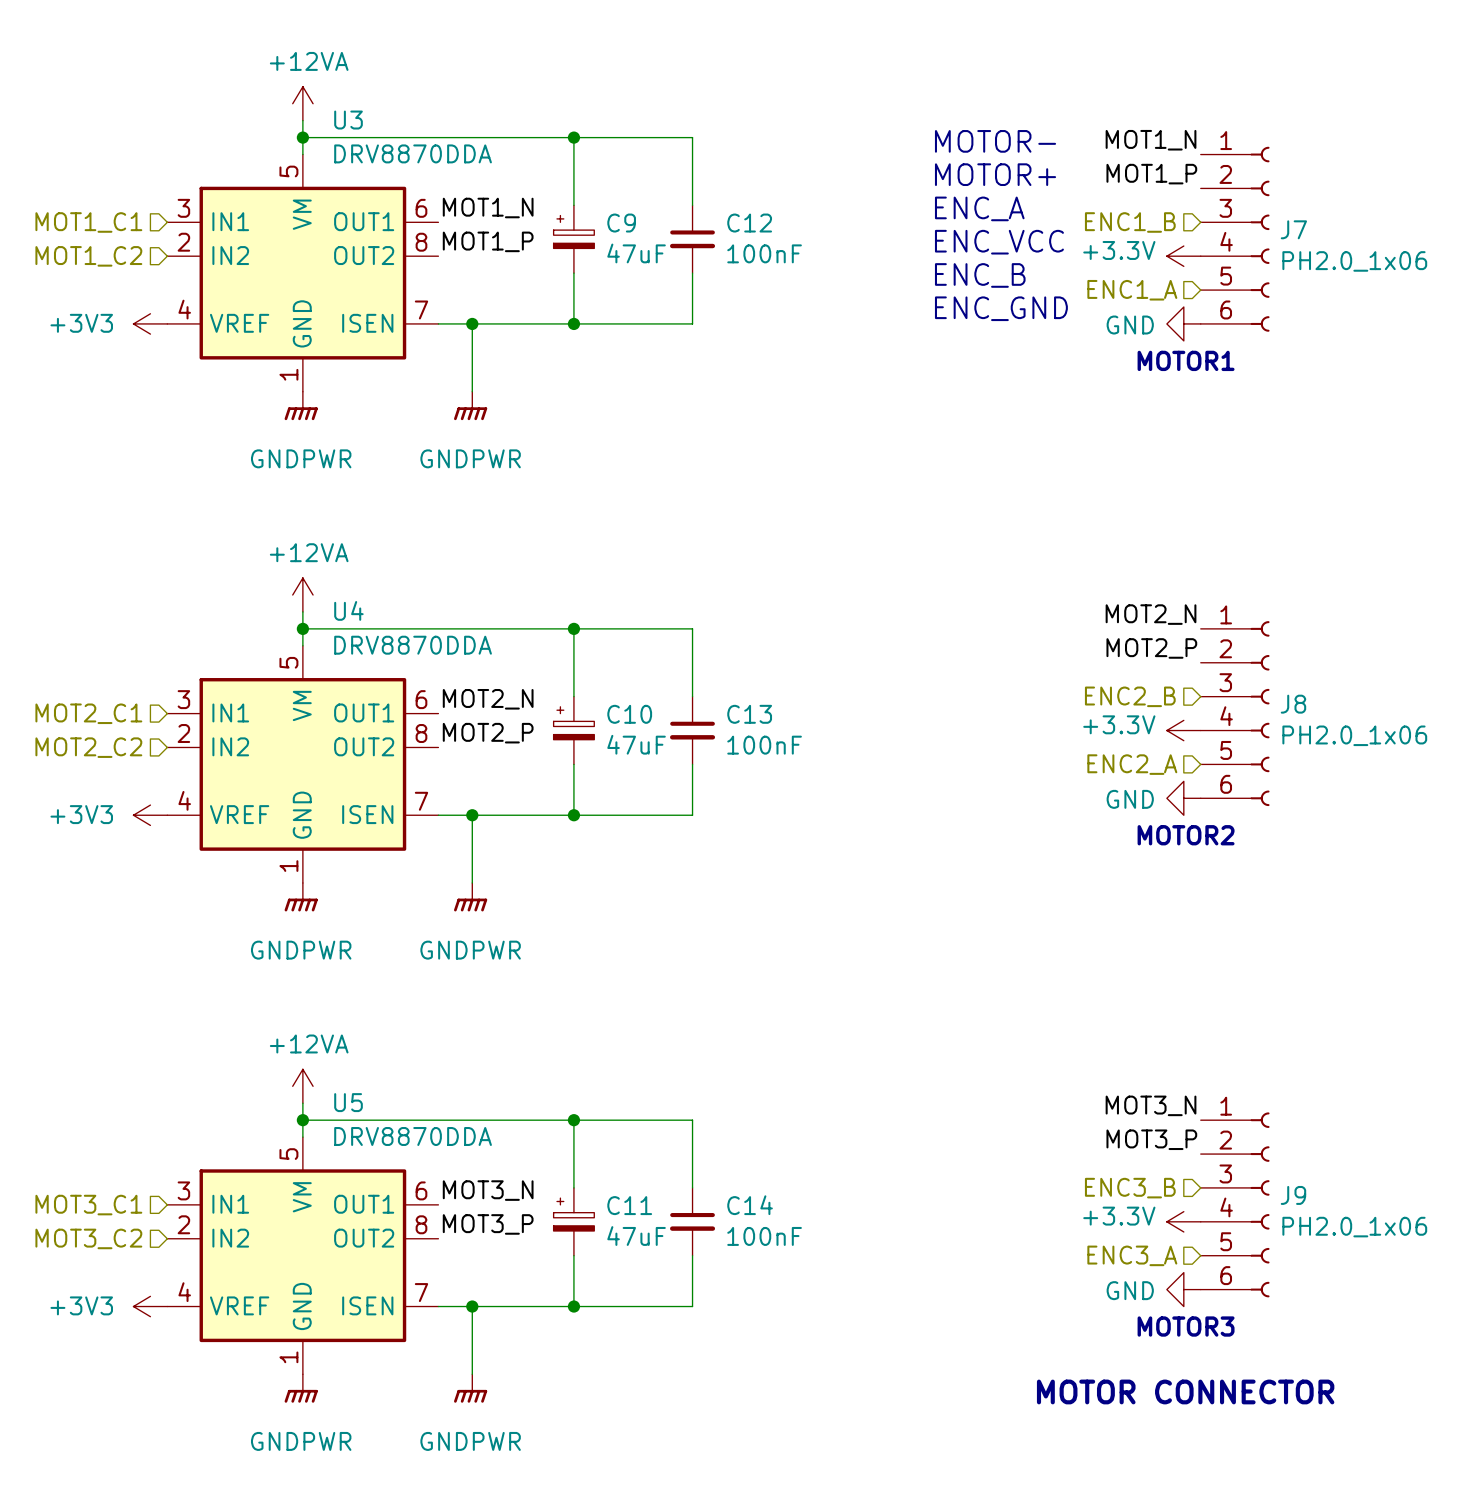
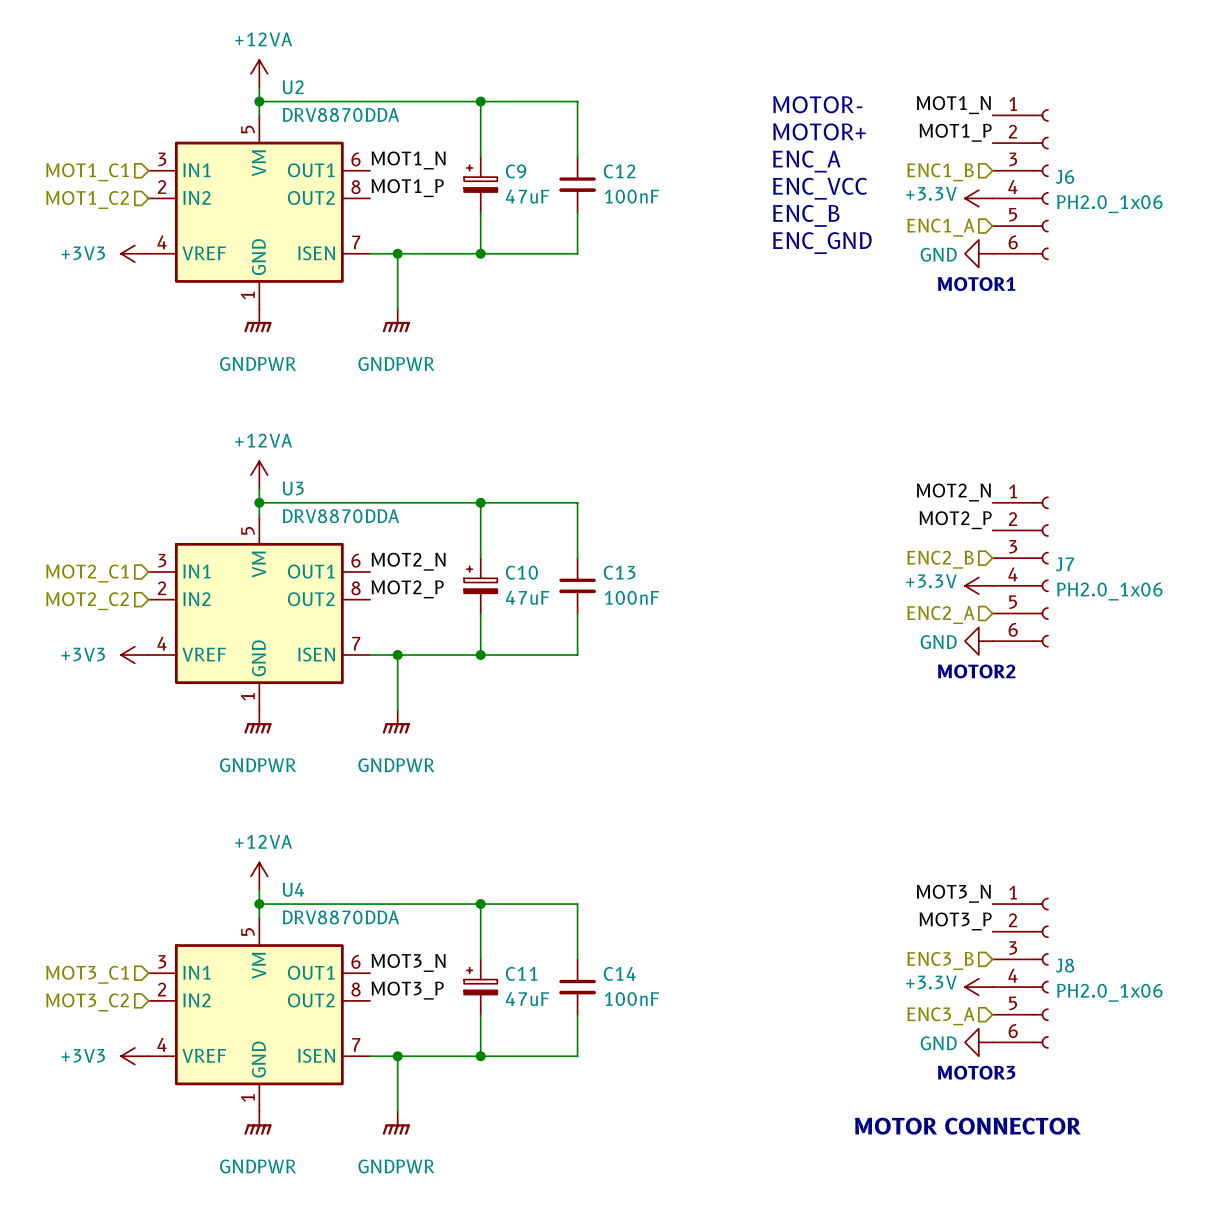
U3 name: U3 (348, 120) -> U2 (293, 87)
J7 name: J7 (1293, 229) -> J6 (1064, 176)
U4 name: U4 (348, 610) -> U3 (293, 488)
J8 name: J8 (1293, 704) -> J7 (1064, 564)
U5 name: U5 (348, 1102) -> U4 (293, 889)
J9 name: J9 (1293, 1195) -> J8 (1064, 965)

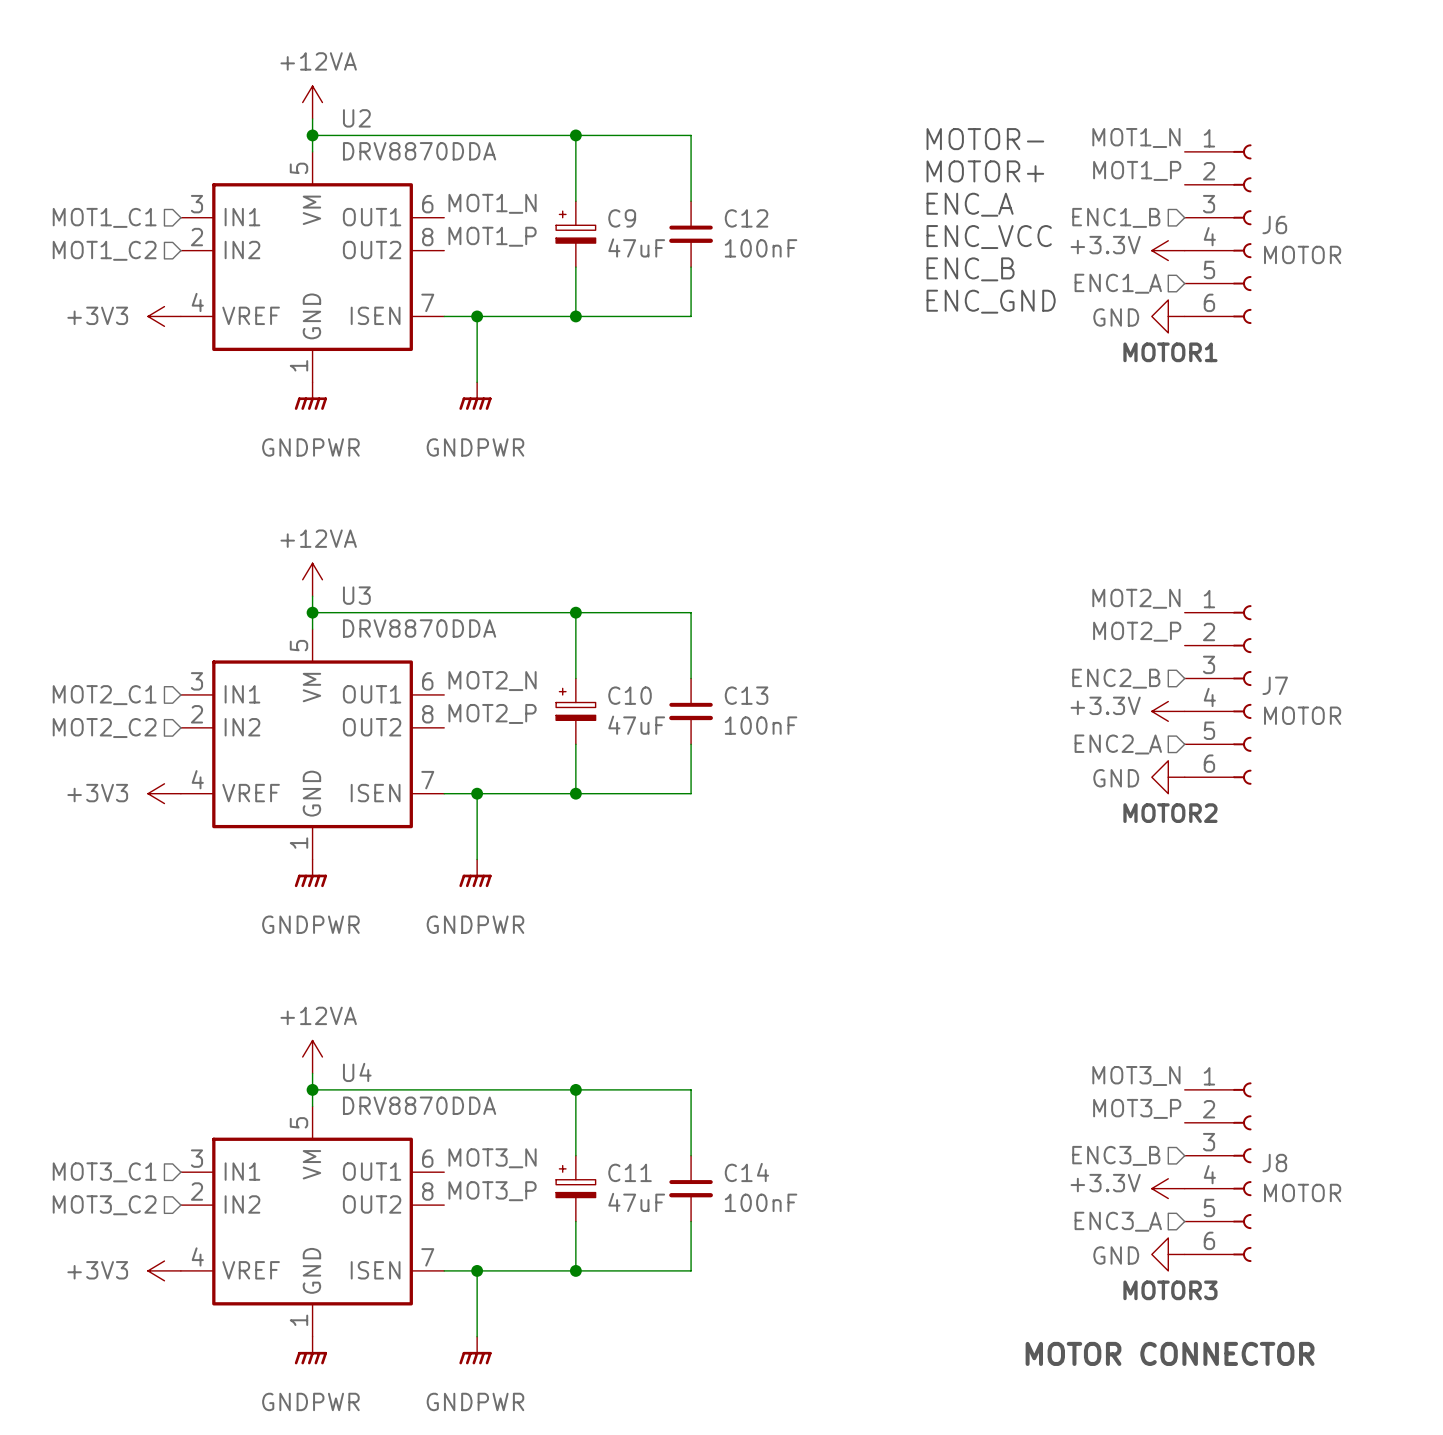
J6 value: PH2.0_1x06 (1109, 204) -> MOTOR (1302, 254)
J7 value: PH2.0_1x06 (1109, 591) -> MOTOR (1302, 715)
J8 value: PH2.0_1x06 (1109, 992) -> MOTOR (1302, 1192)

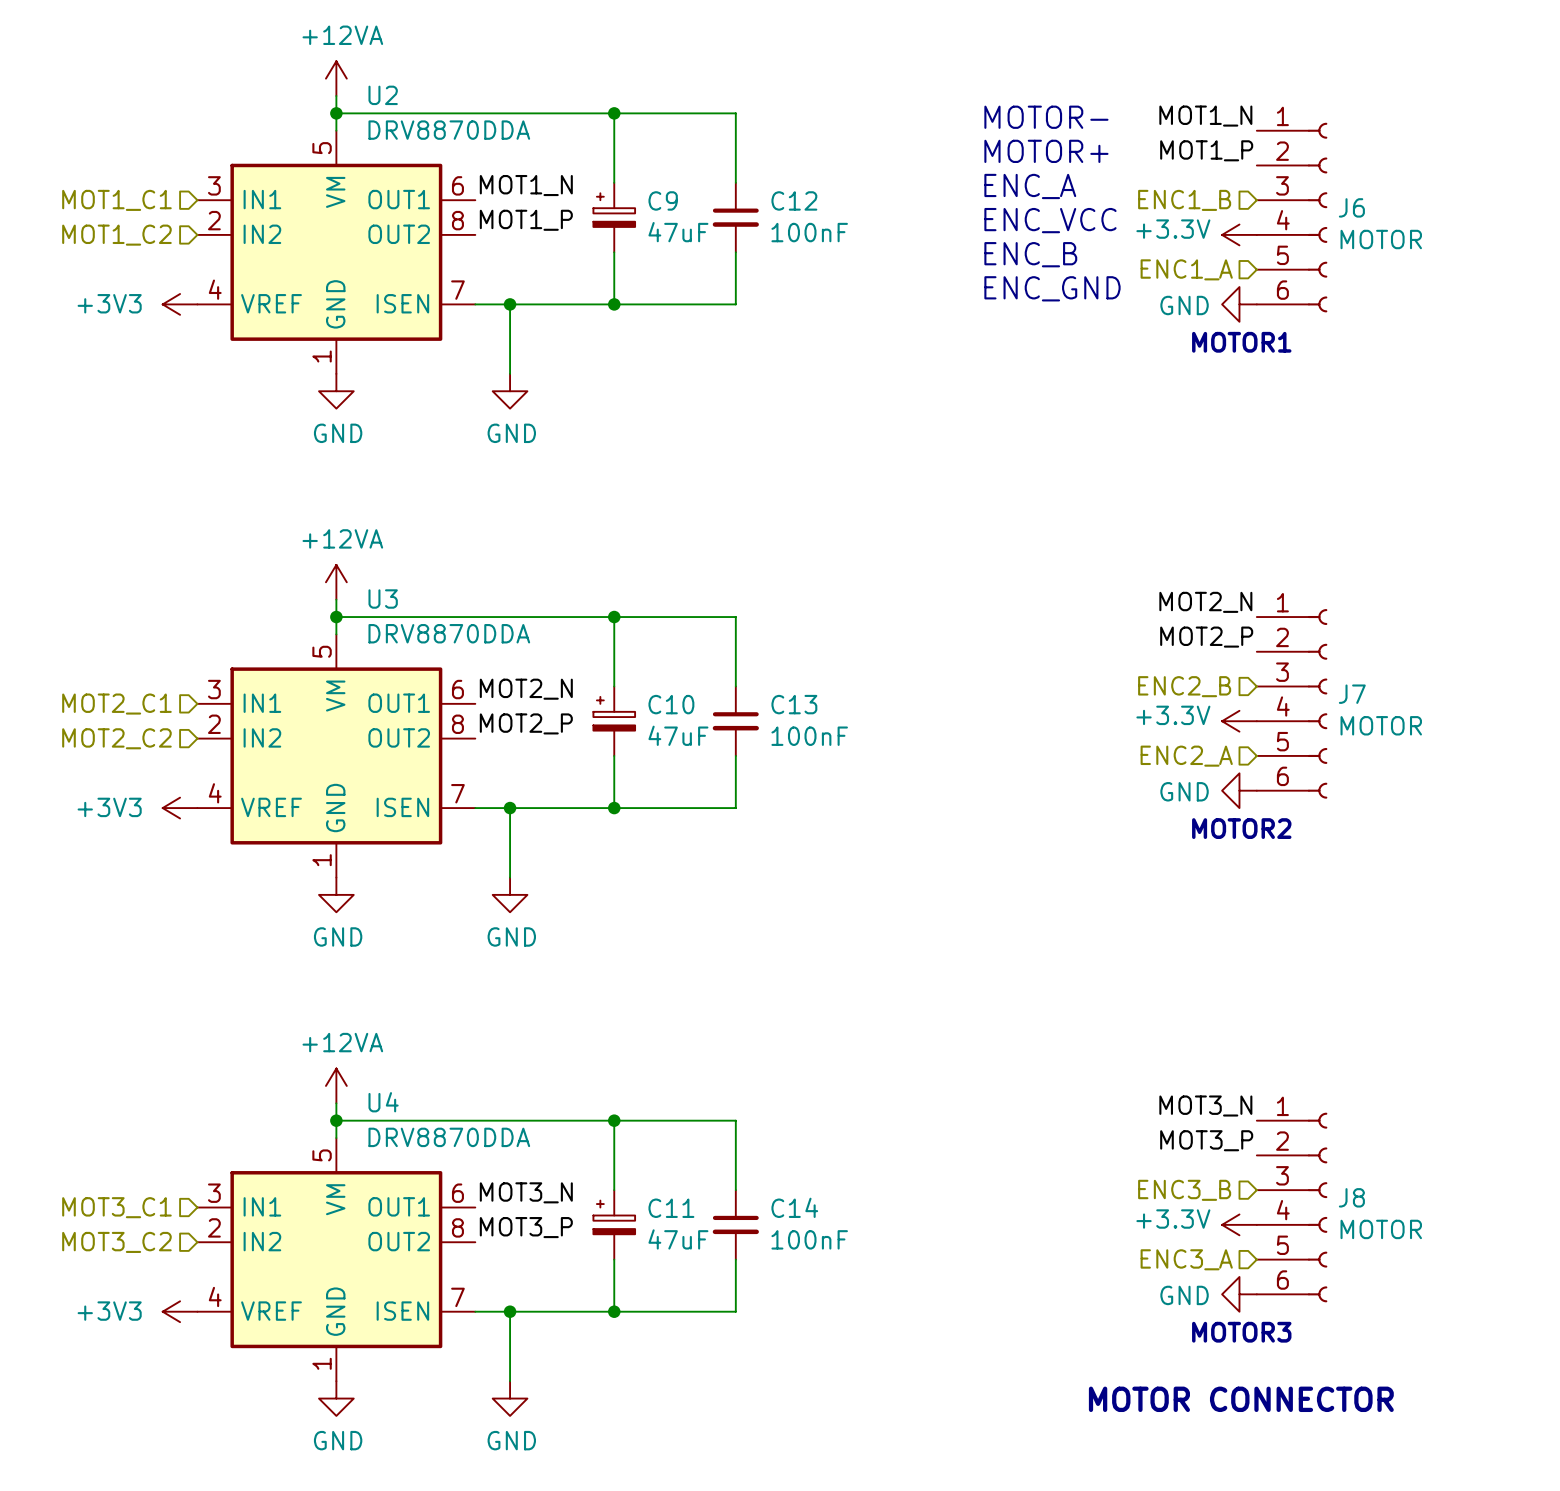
power symbol: GNDPWR (310, 396) -> GND (336, 391)
power symbol: GNDPWR (475, 396) -> GND (510, 391)
power symbol: GNDPWR (310, 873) -> GND (336, 894)
power symbol: GNDPWR (475, 873) -> GND (510, 894)
power symbol: GNDPWR (310, 1350) -> GND (336, 1398)
power symbol: GNDPWR (475, 1350) -> GND (510, 1398)

